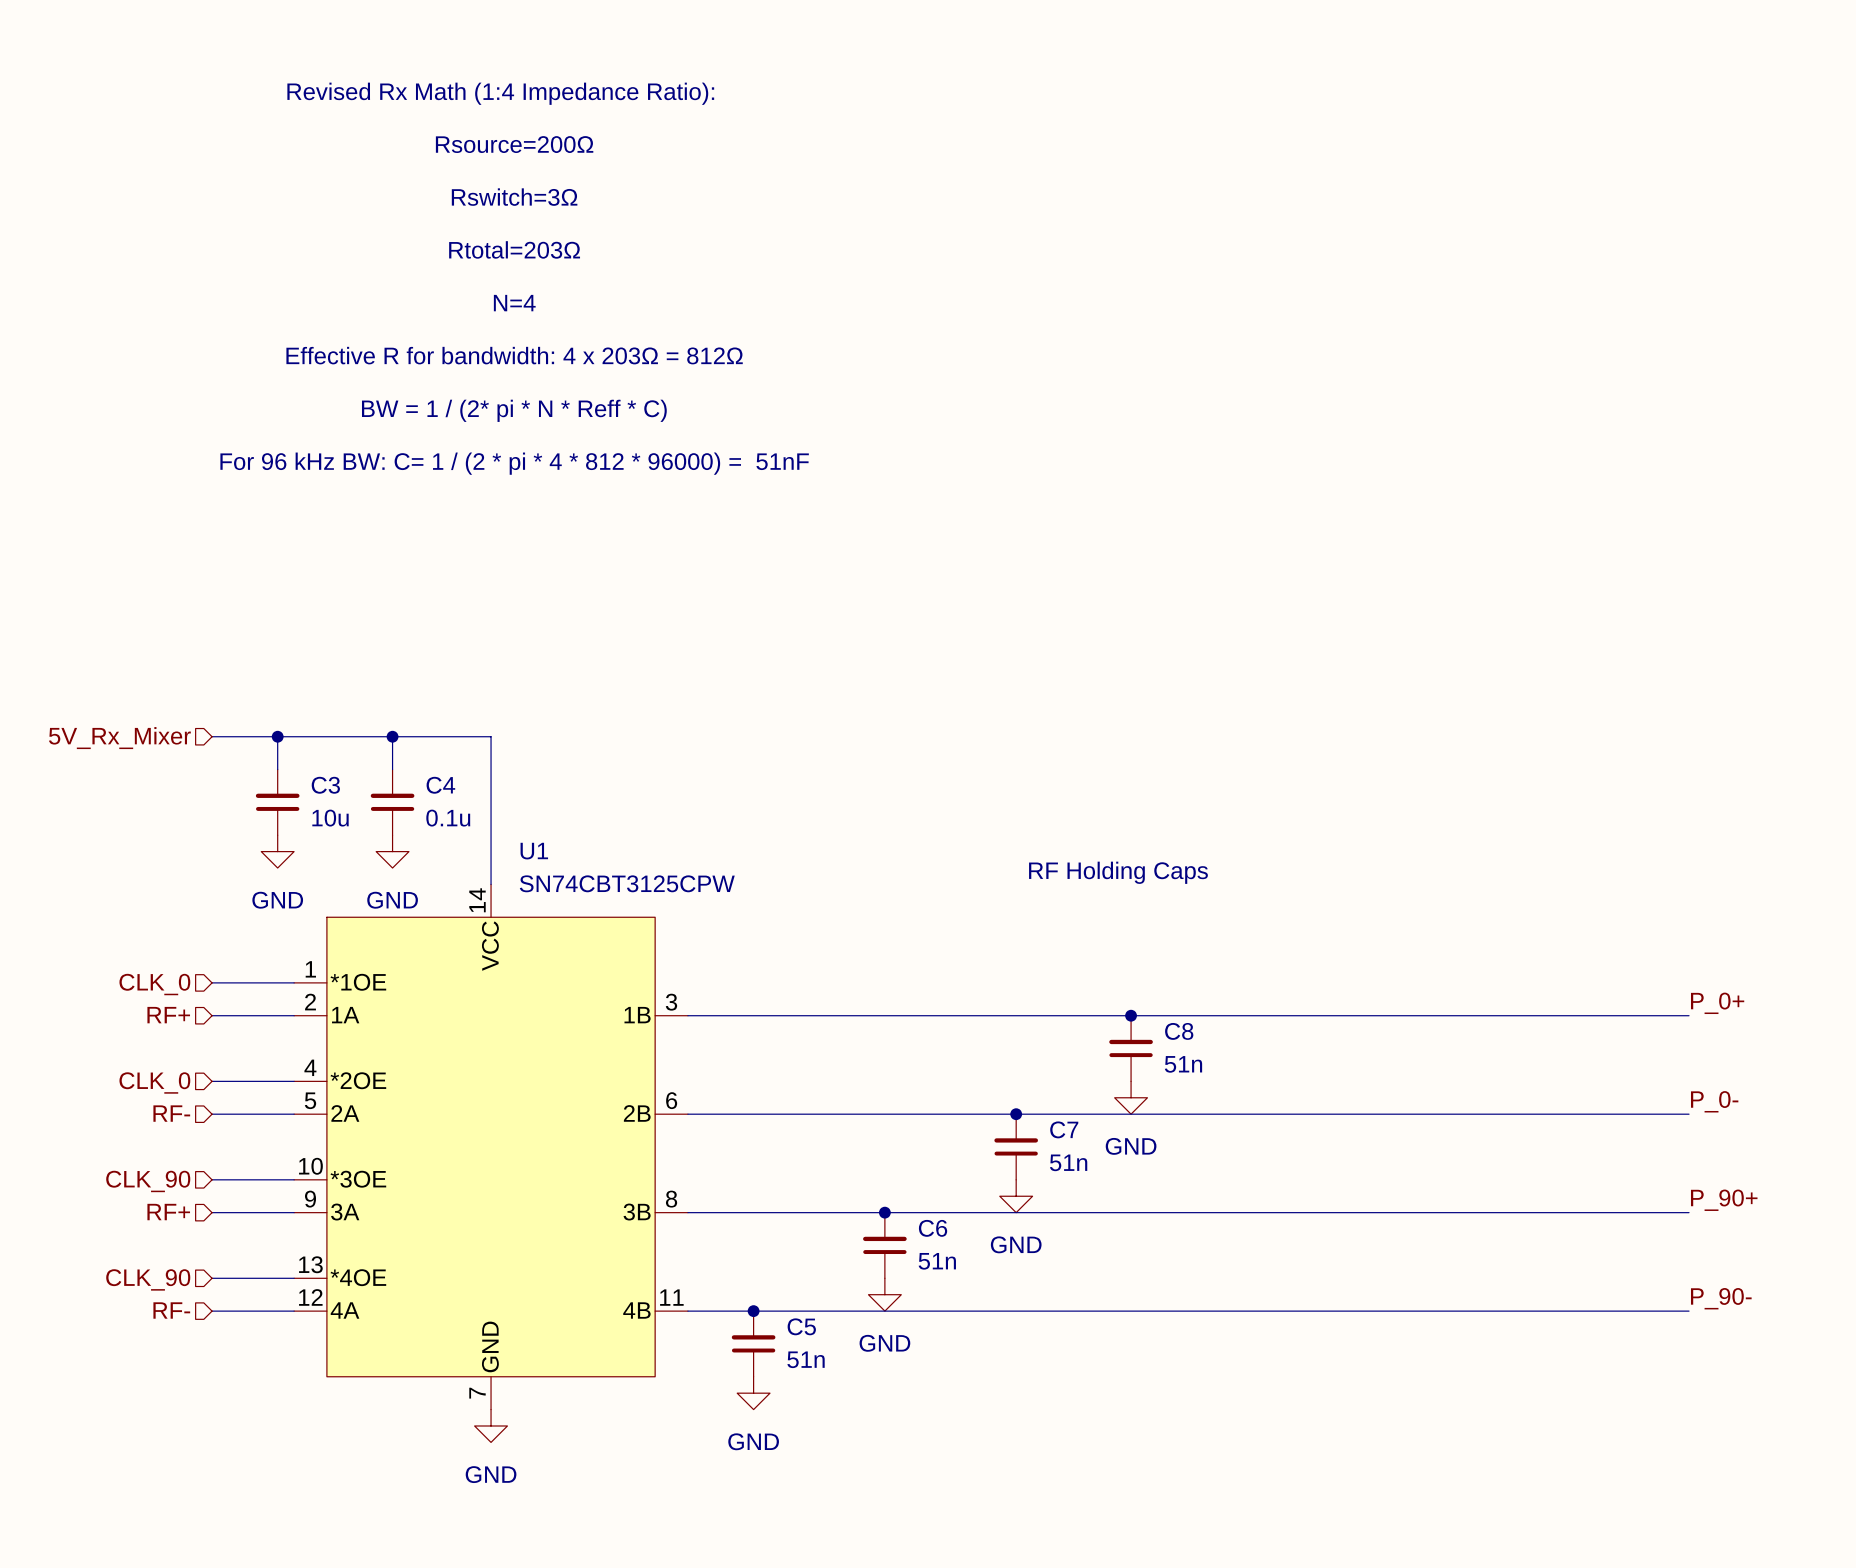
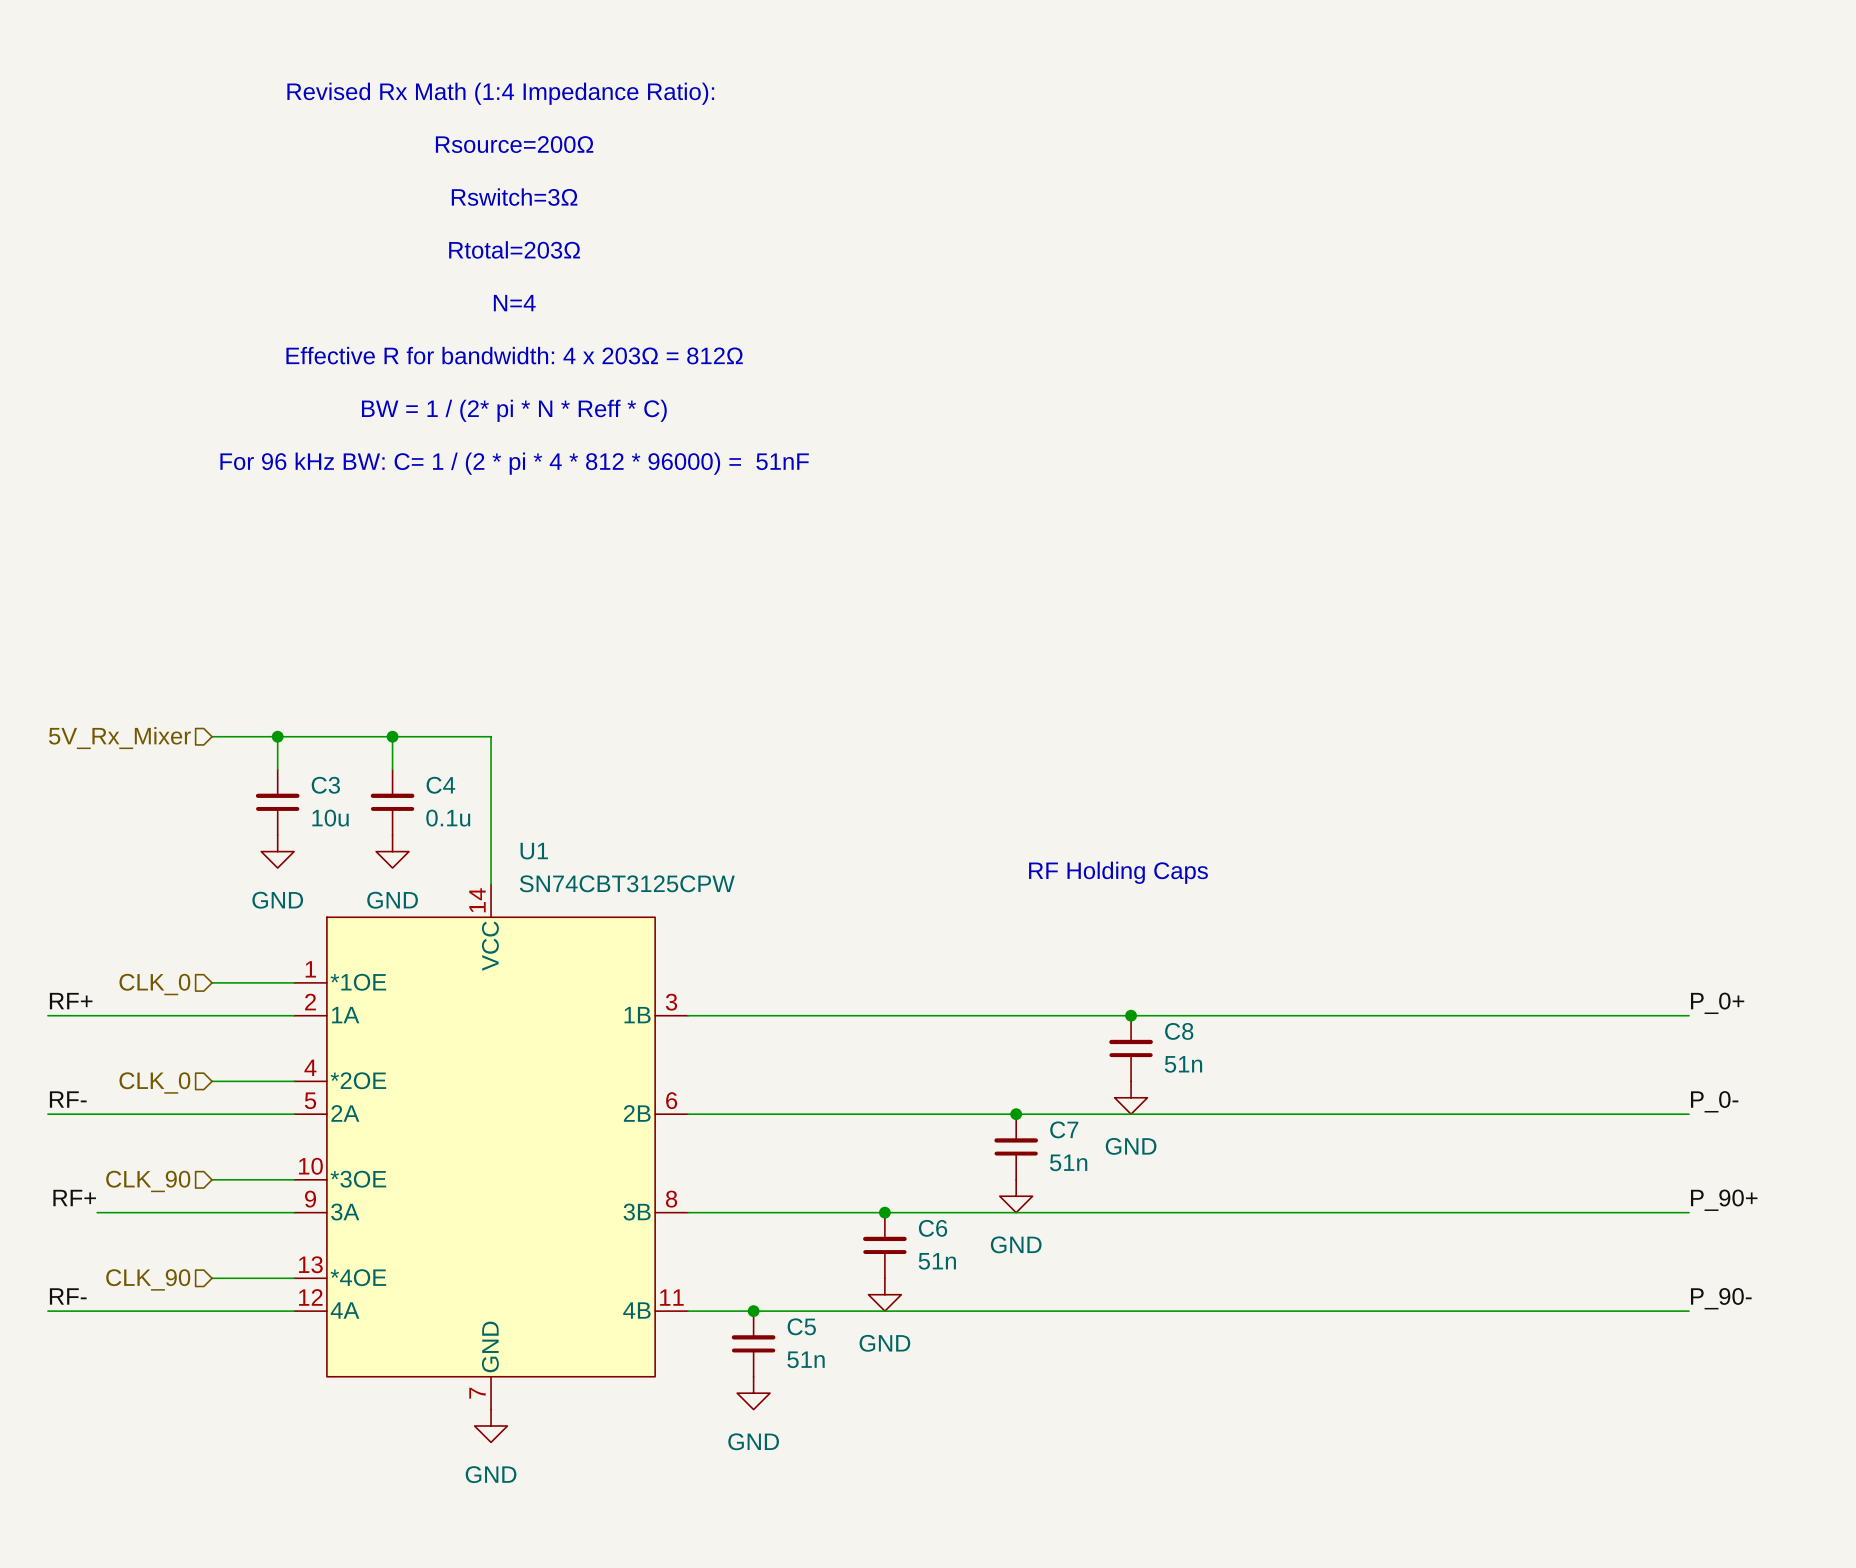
label: none -> RF+ (71, 1001)
wire: none -> (47, 1015) (212, 1015)
hierarchical label: RF+ (168, 1015) -> none
label: none -> RF- (68, 1099)
hierarchical label: RF- (171, 1113) -> none
wire: none -> (47, 1114) (212, 1114)
label: none -> RF+ (74, 1198)
wire: none -> (97, 1212) (212, 1212)
hierarchical label: RF+ (168, 1212) -> none
label: none -> RF- (68, 1296)
hierarchical label: RF- (171, 1310) -> none
wire: none -> (47, 1311) (212, 1311)

